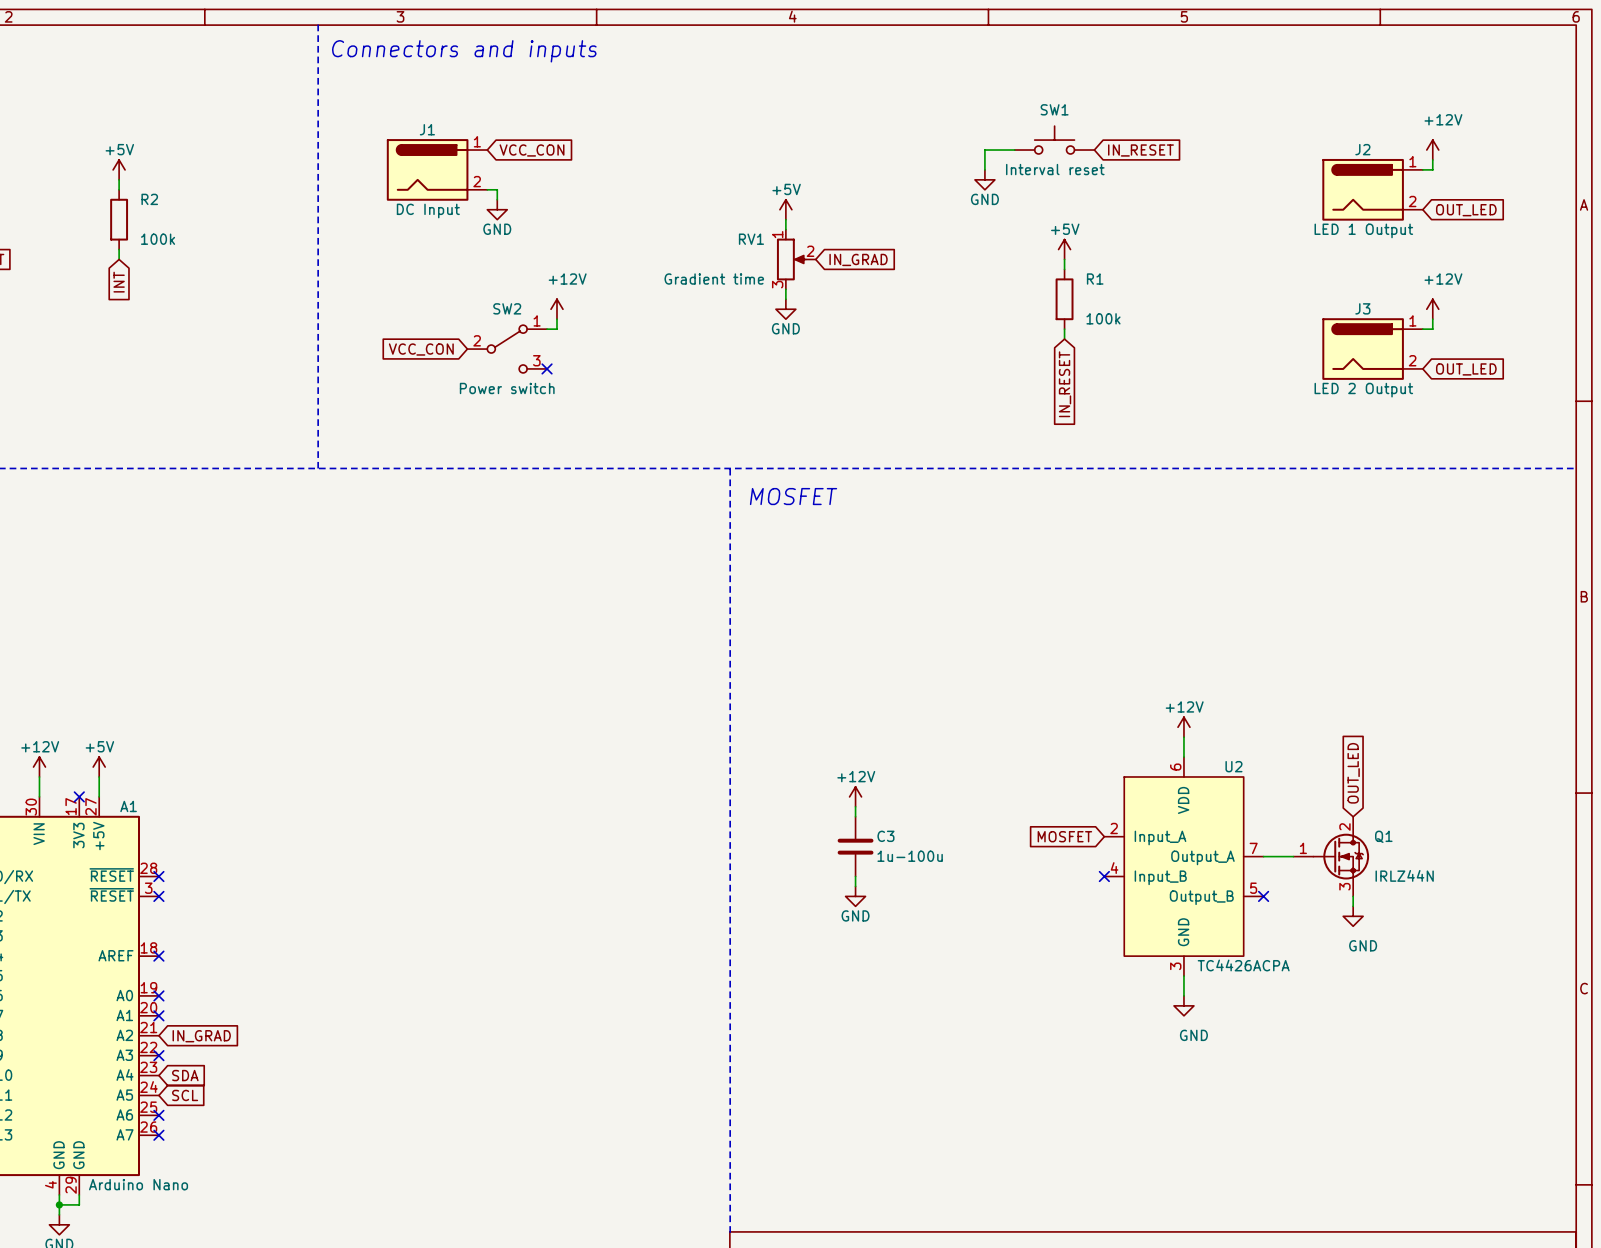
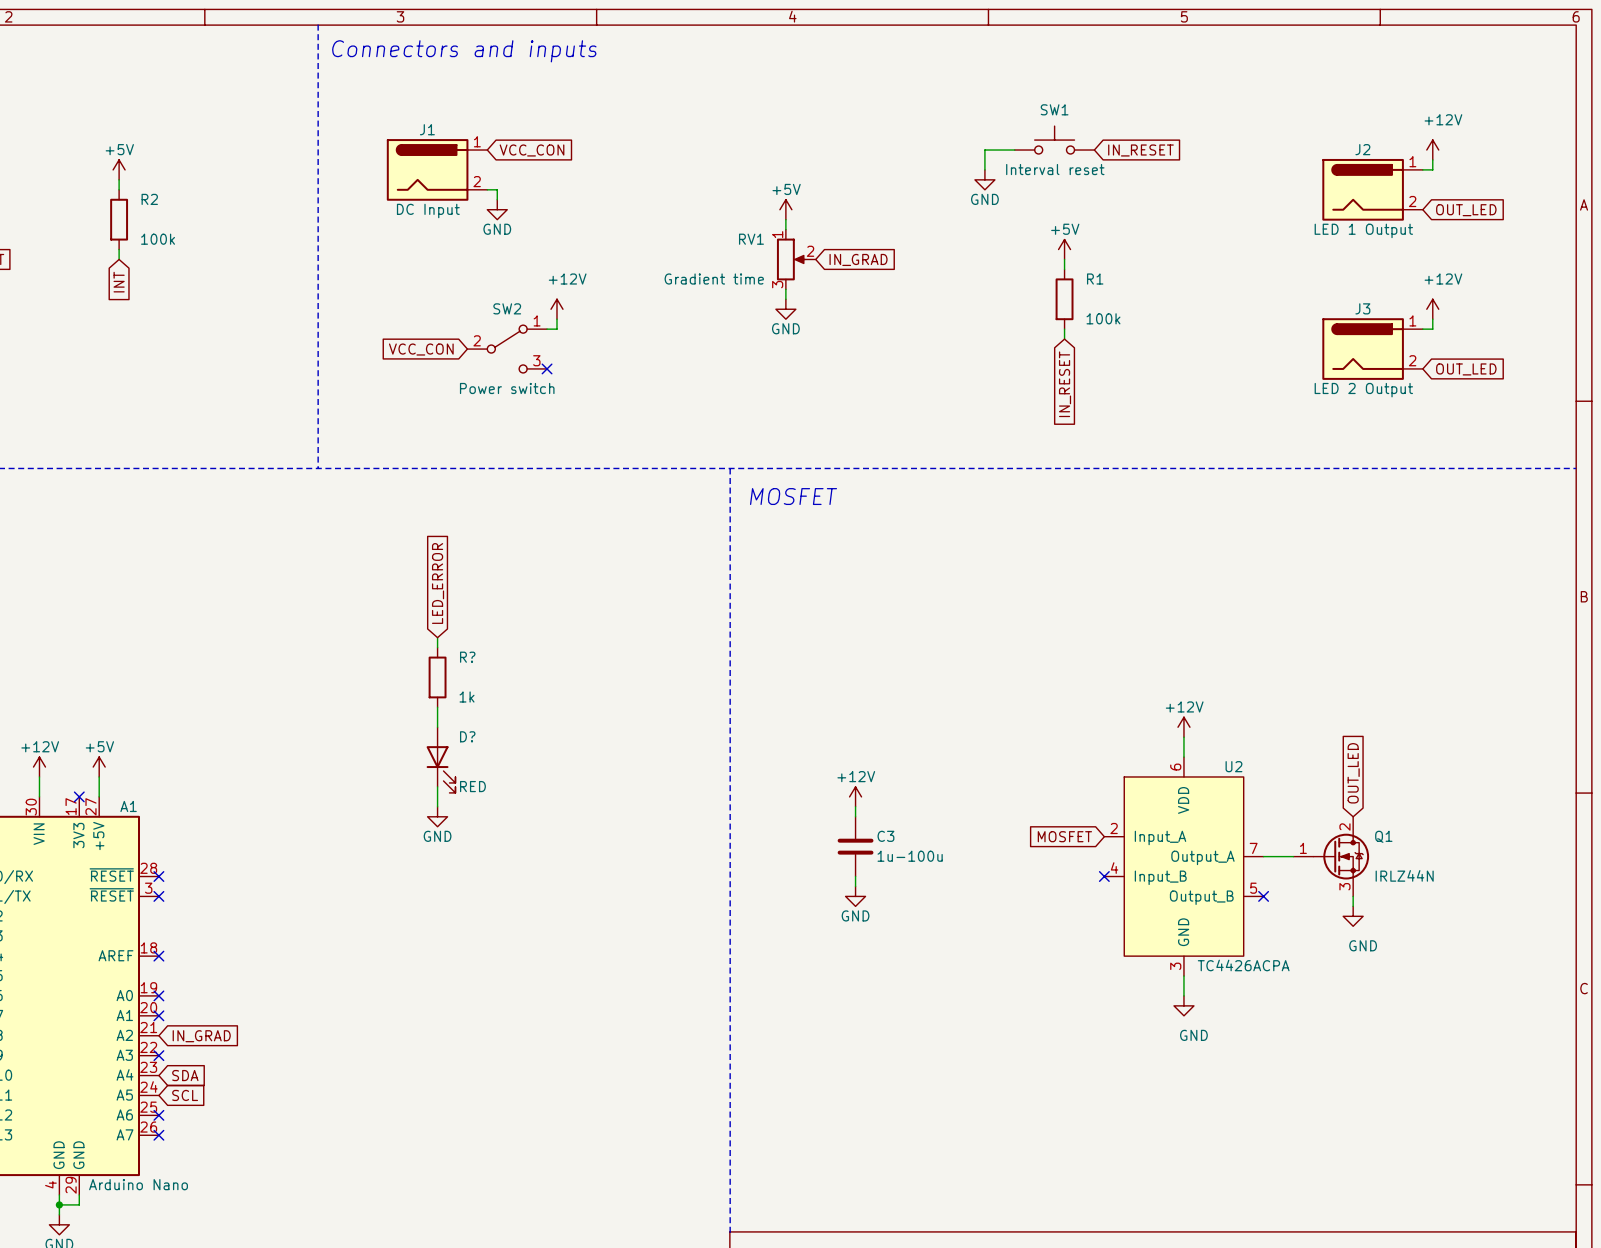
global label: none -> LED_ERROR (438, 583)
wire: none -> (437, 637) (437, 647)
R?: none -> 1k (437, 677)
wire: none -> (437, 707) (437, 727)
D?: none -> RED (441, 760)
wire: none -> (437, 786) (437, 806)
power symbol: none -> GND (437, 816)

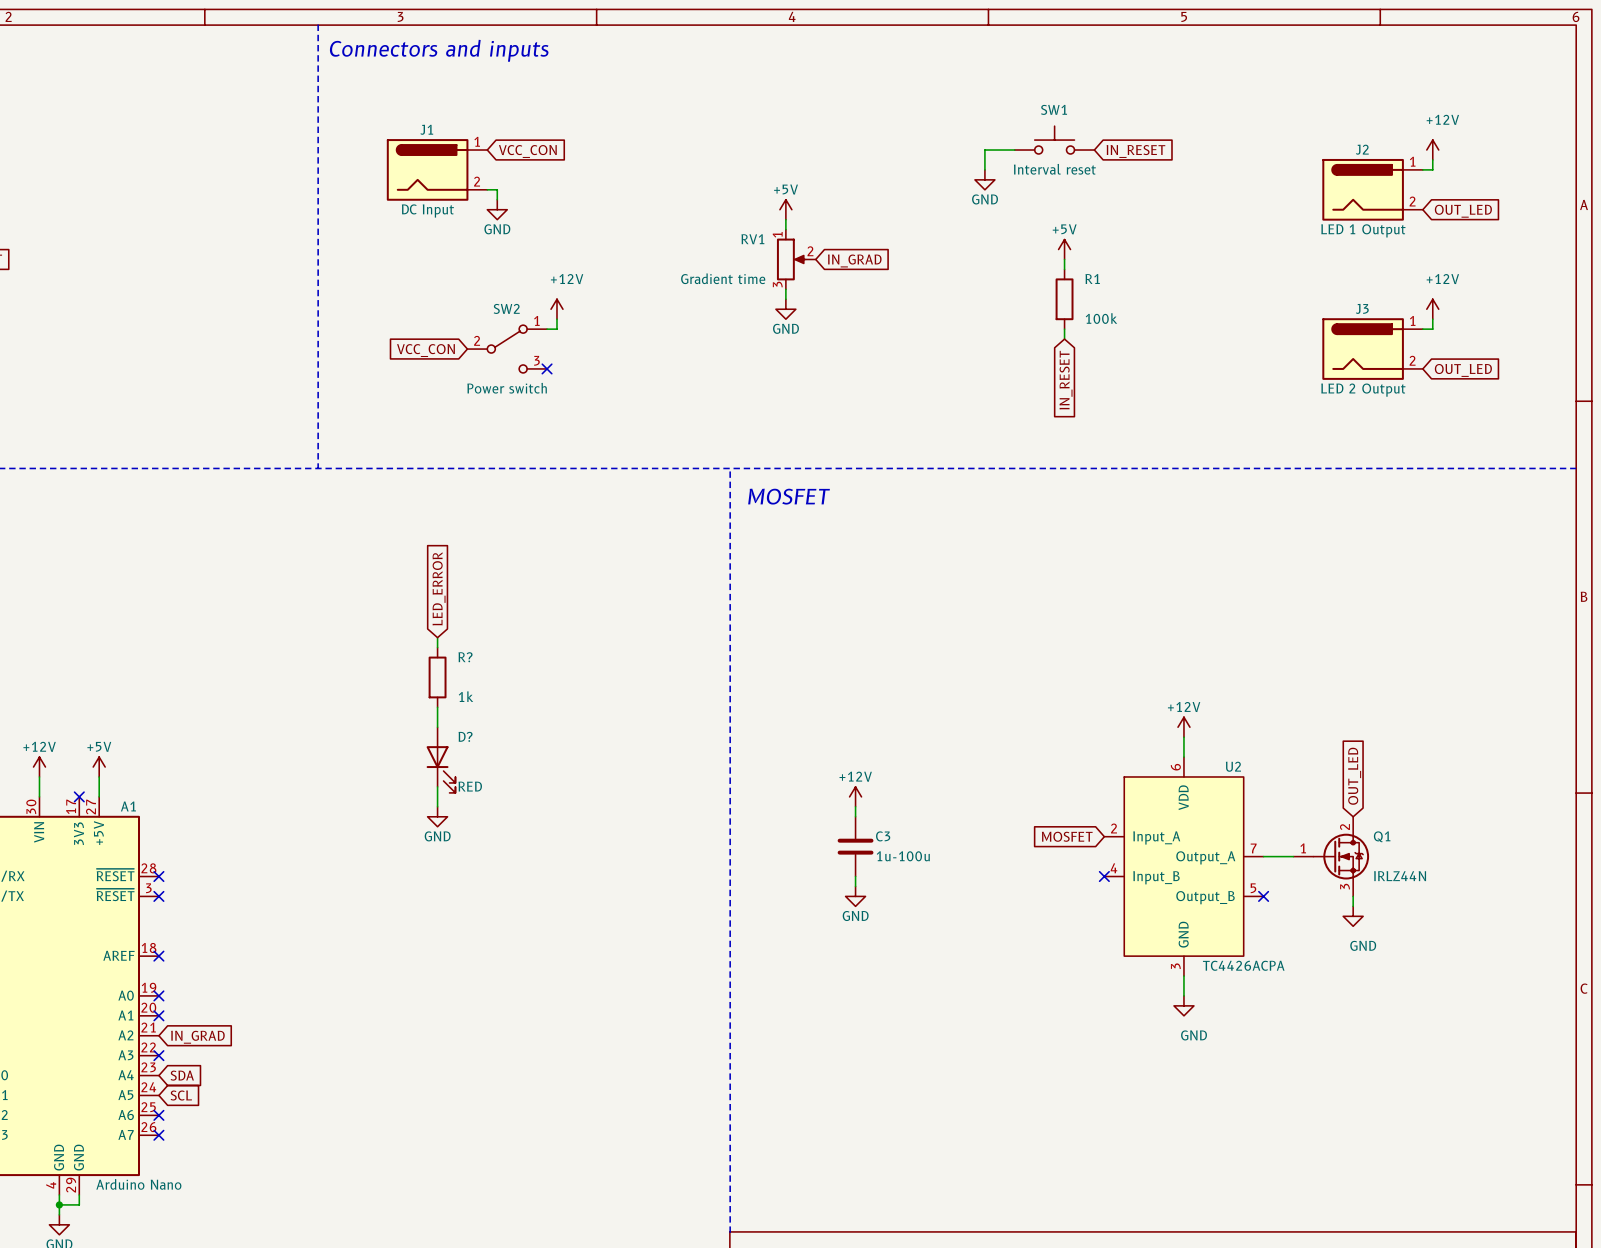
power symbol: +5V (119, 169) -> none
wire: (119, 179) (119, 189) -> none
R2: 100k (119, 219) -> none
wire: (119, 249) (119, 259) -> none
global label: INT (119, 282) -> none

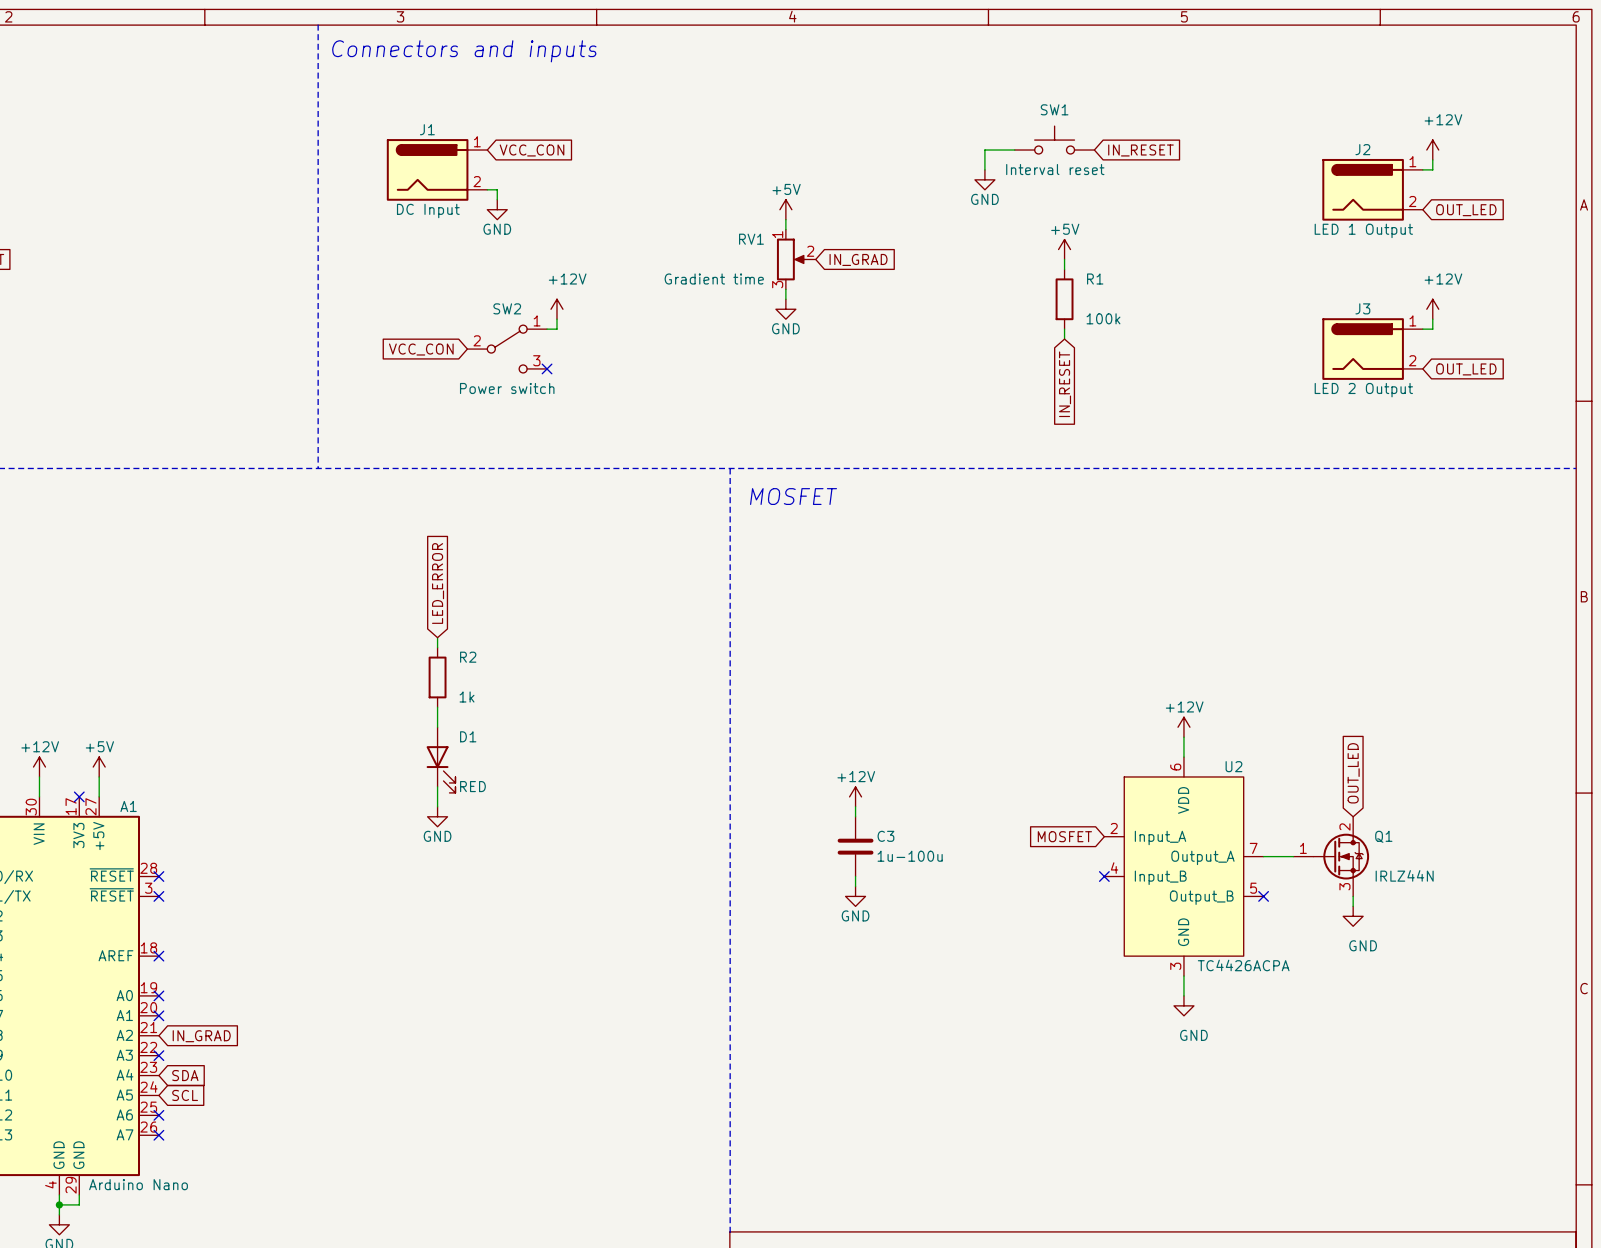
R? name: R? (465, 657) -> R2 (468, 657)
D? name: D? (465, 736) -> D1 (468, 736)

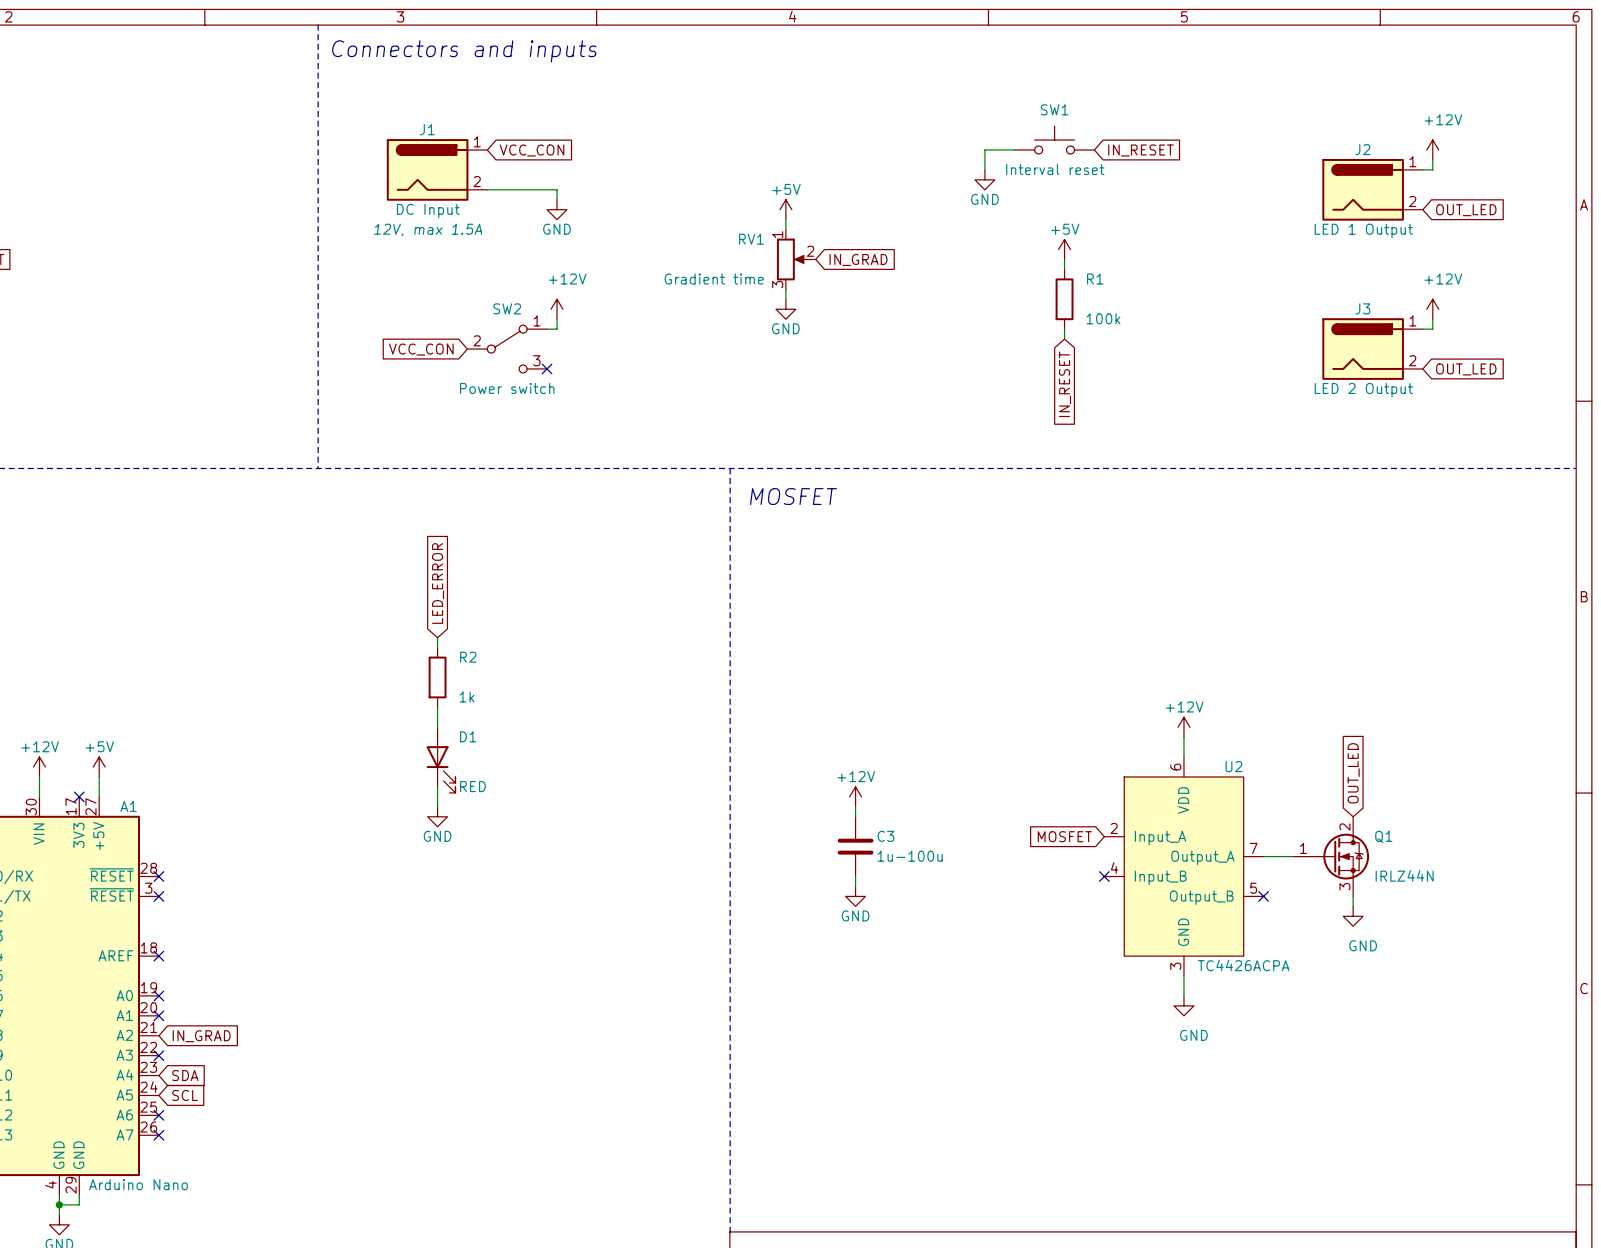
wire: (497, 189) (497, 199) -> (497, 189) (556, 189) (556, 199)
power symbol position: GND (497, 209) -> GND (556, 209)
J1 text: none -> 12V, max 1.5A (428, 229)

